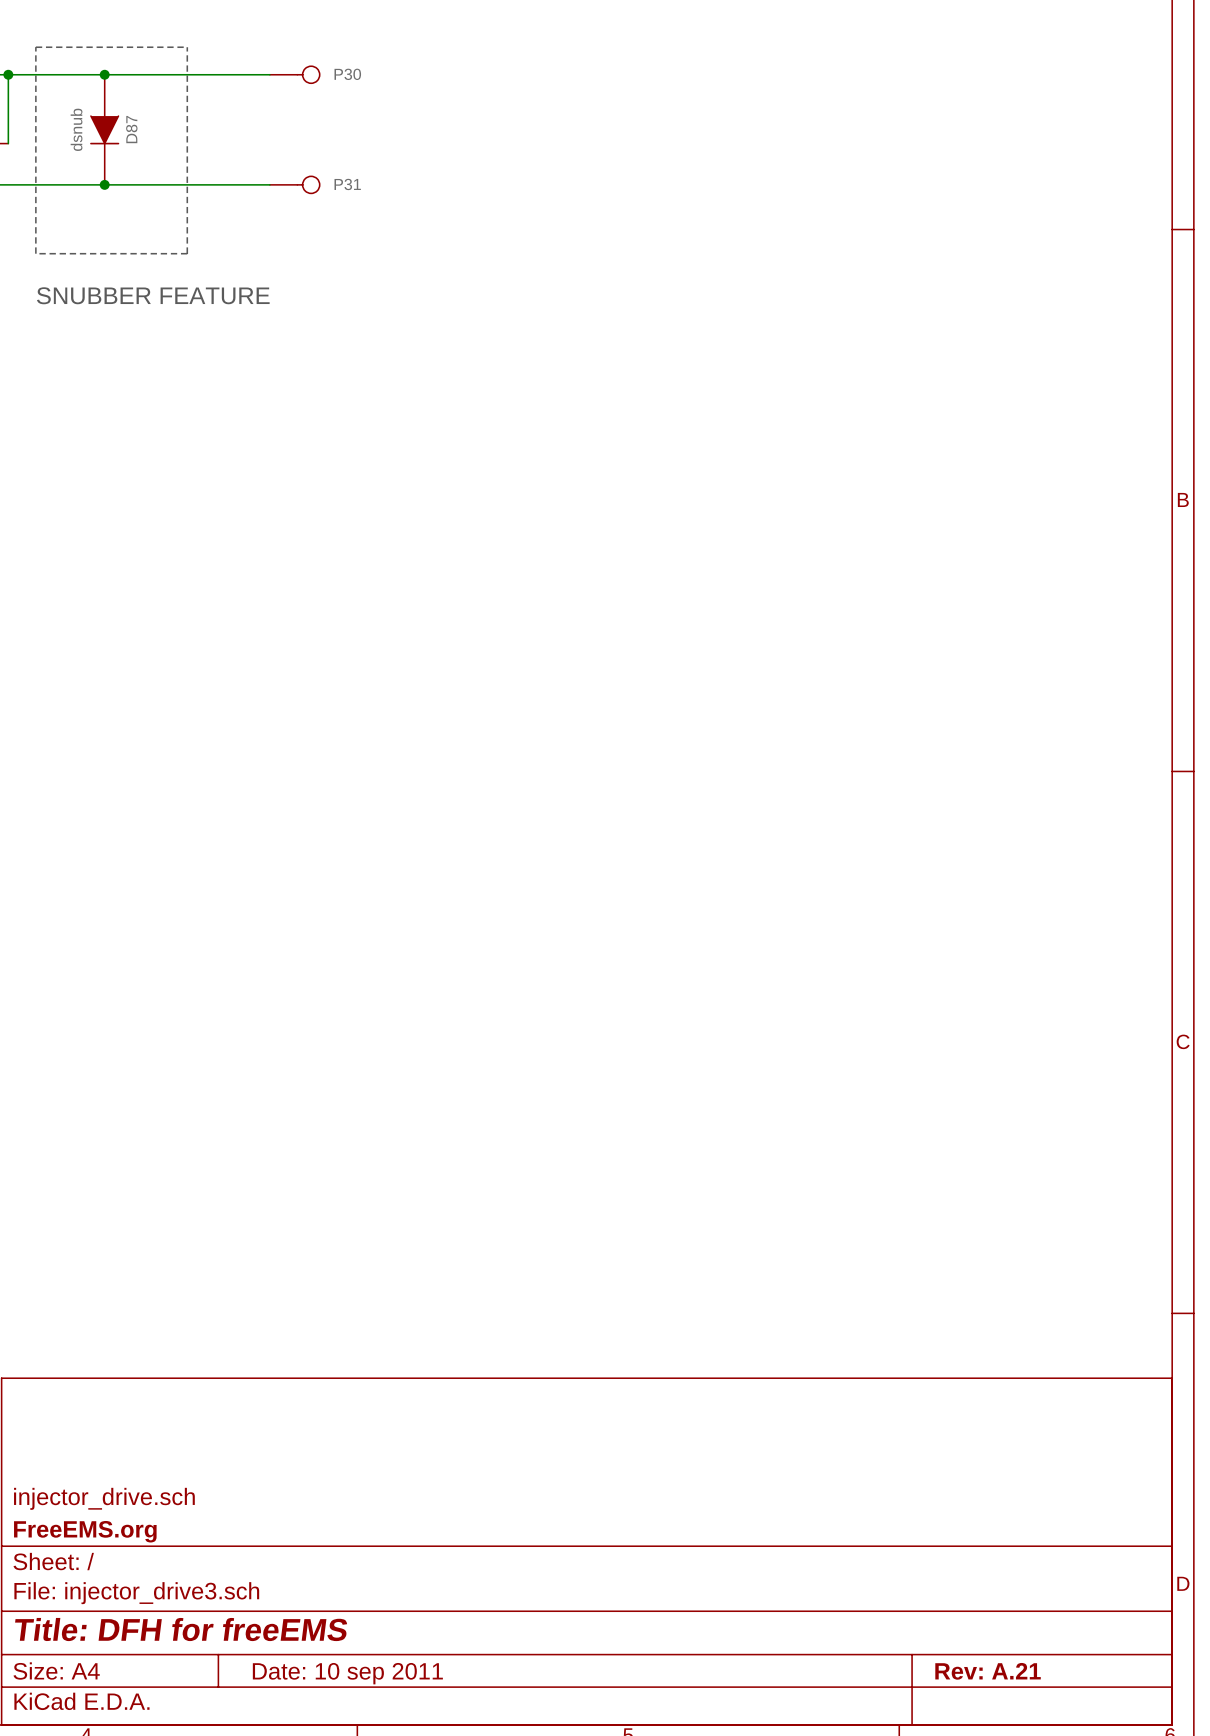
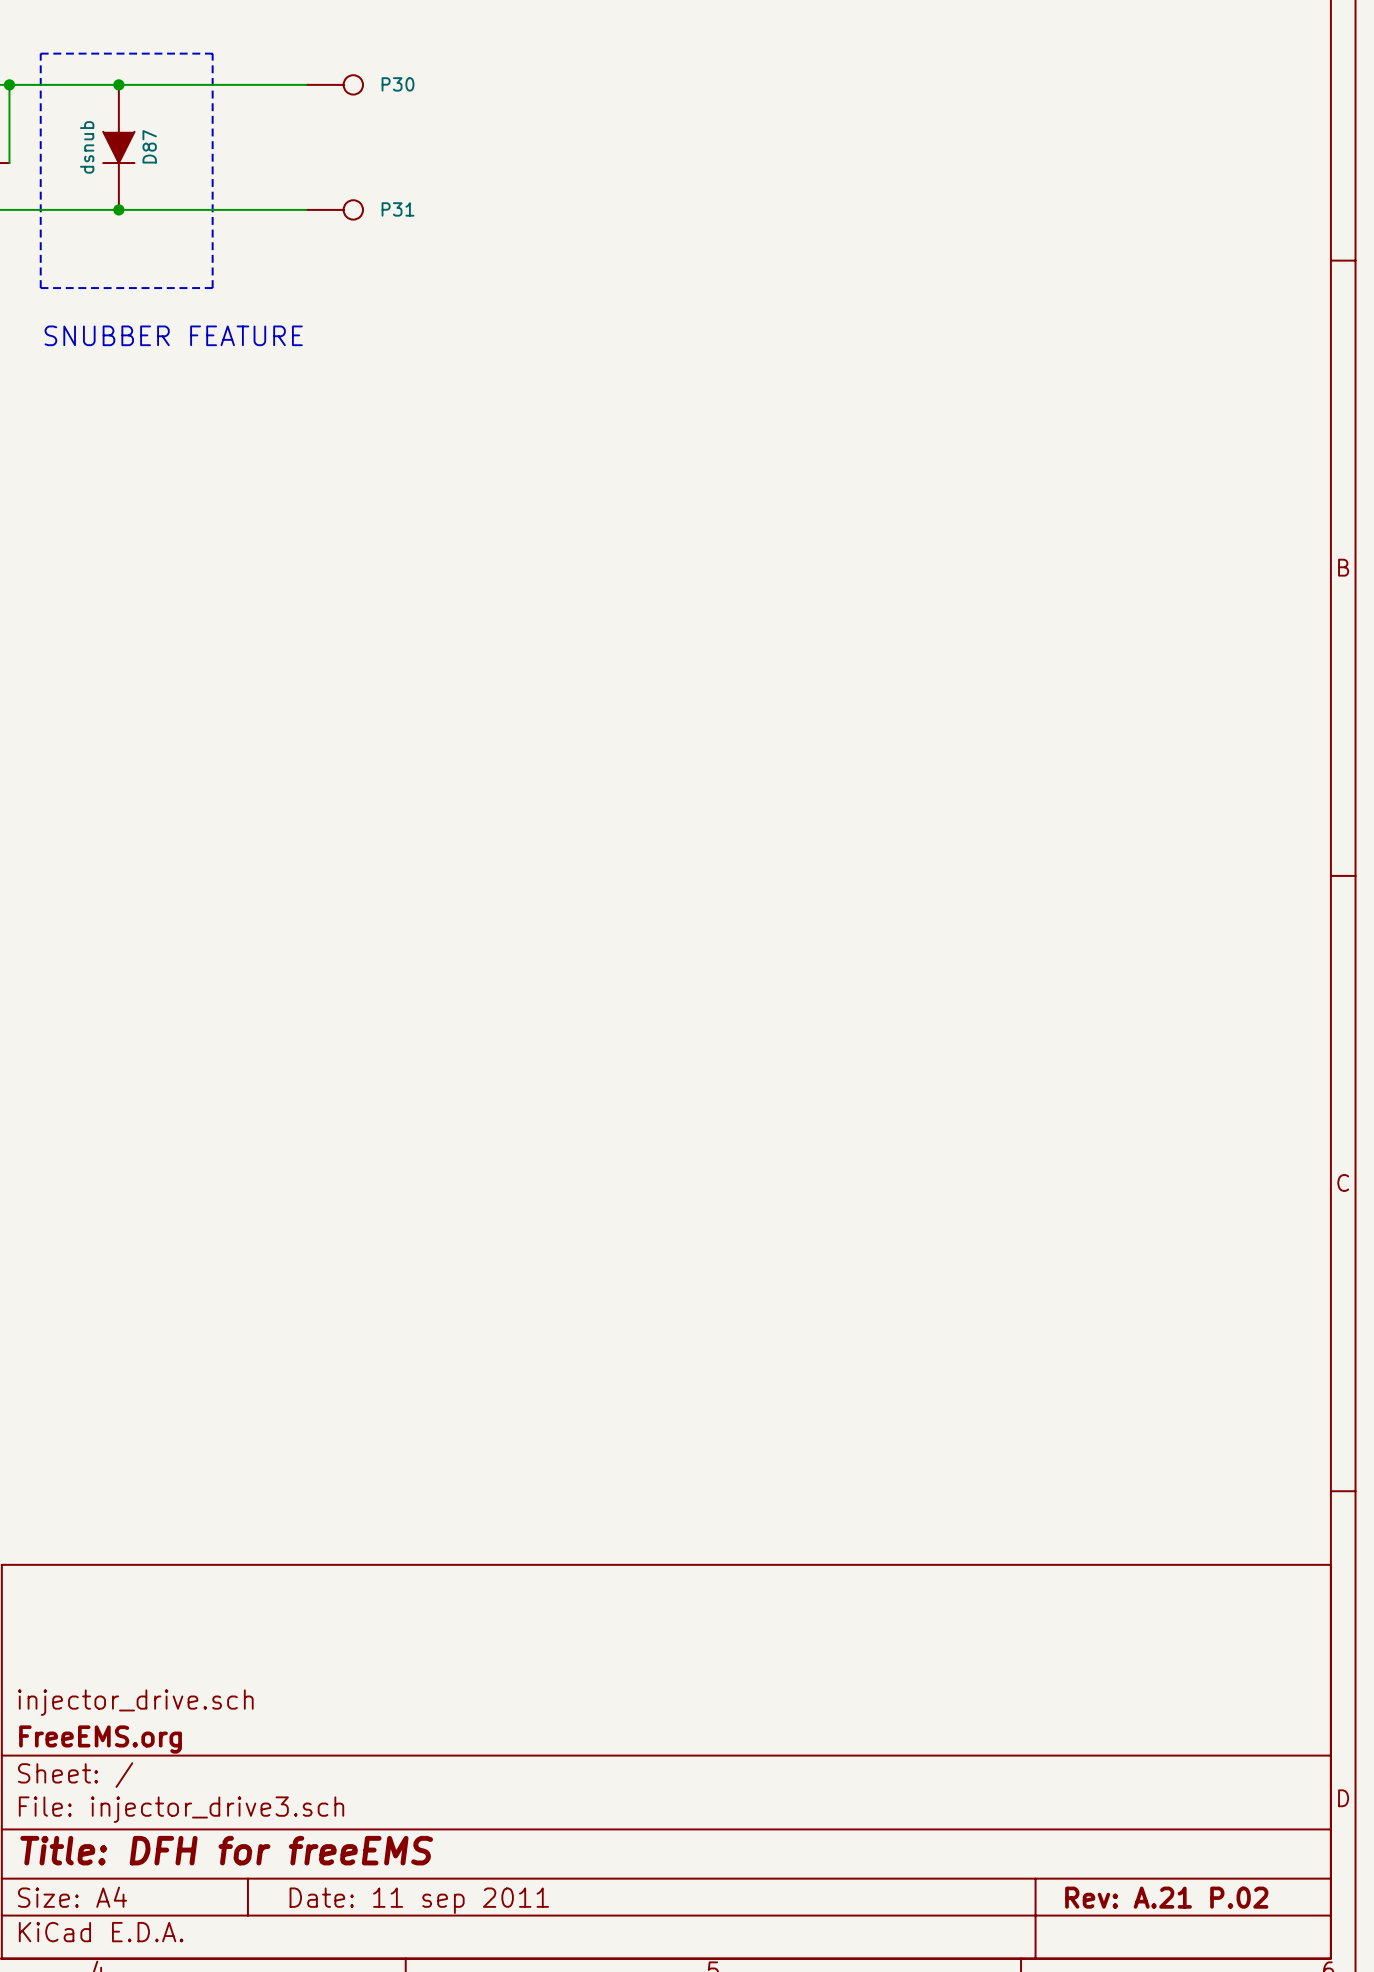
title block: Rev: A.21 (988, 1671) -> Rev: A.21 P.02 (1166, 1897)
title block: Date: 10 sep 2011 (347, 1673) -> Date: 11 sep 2011 (419, 1900)

